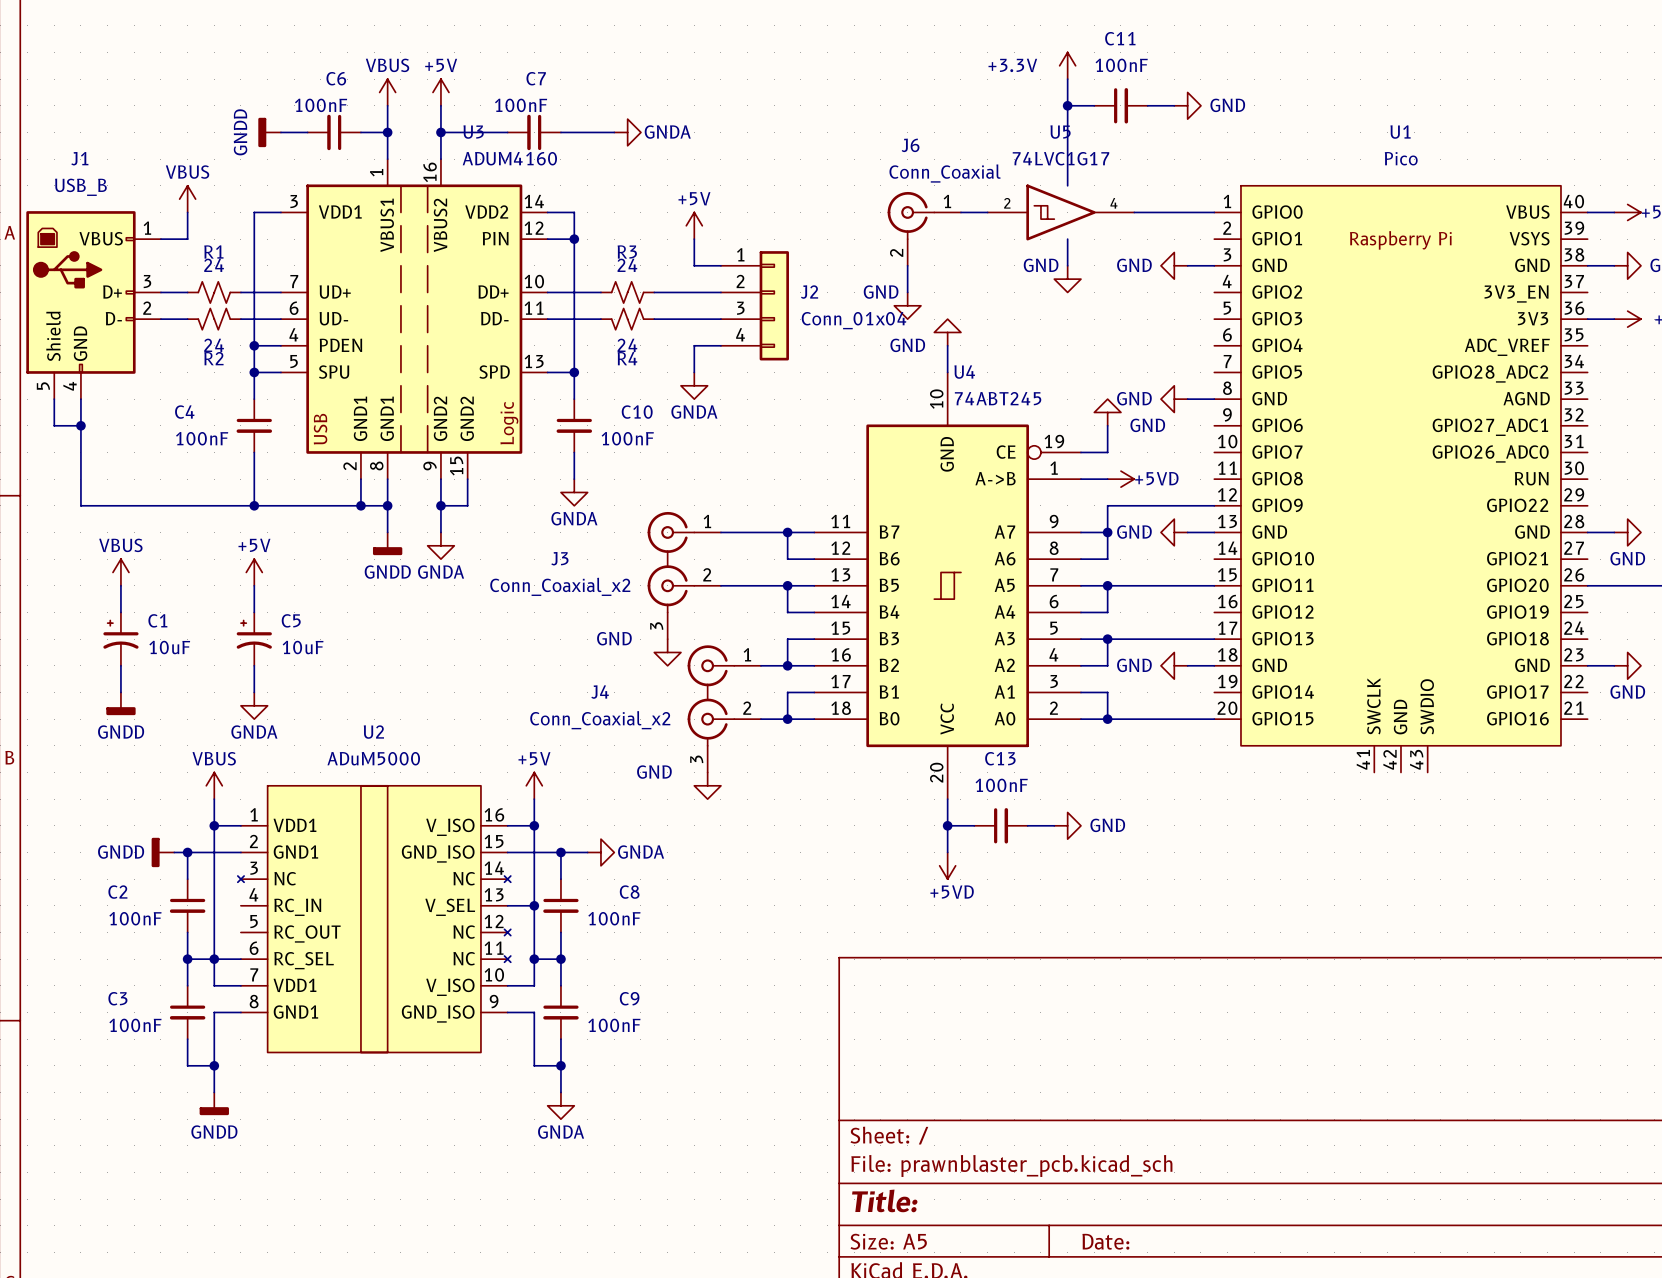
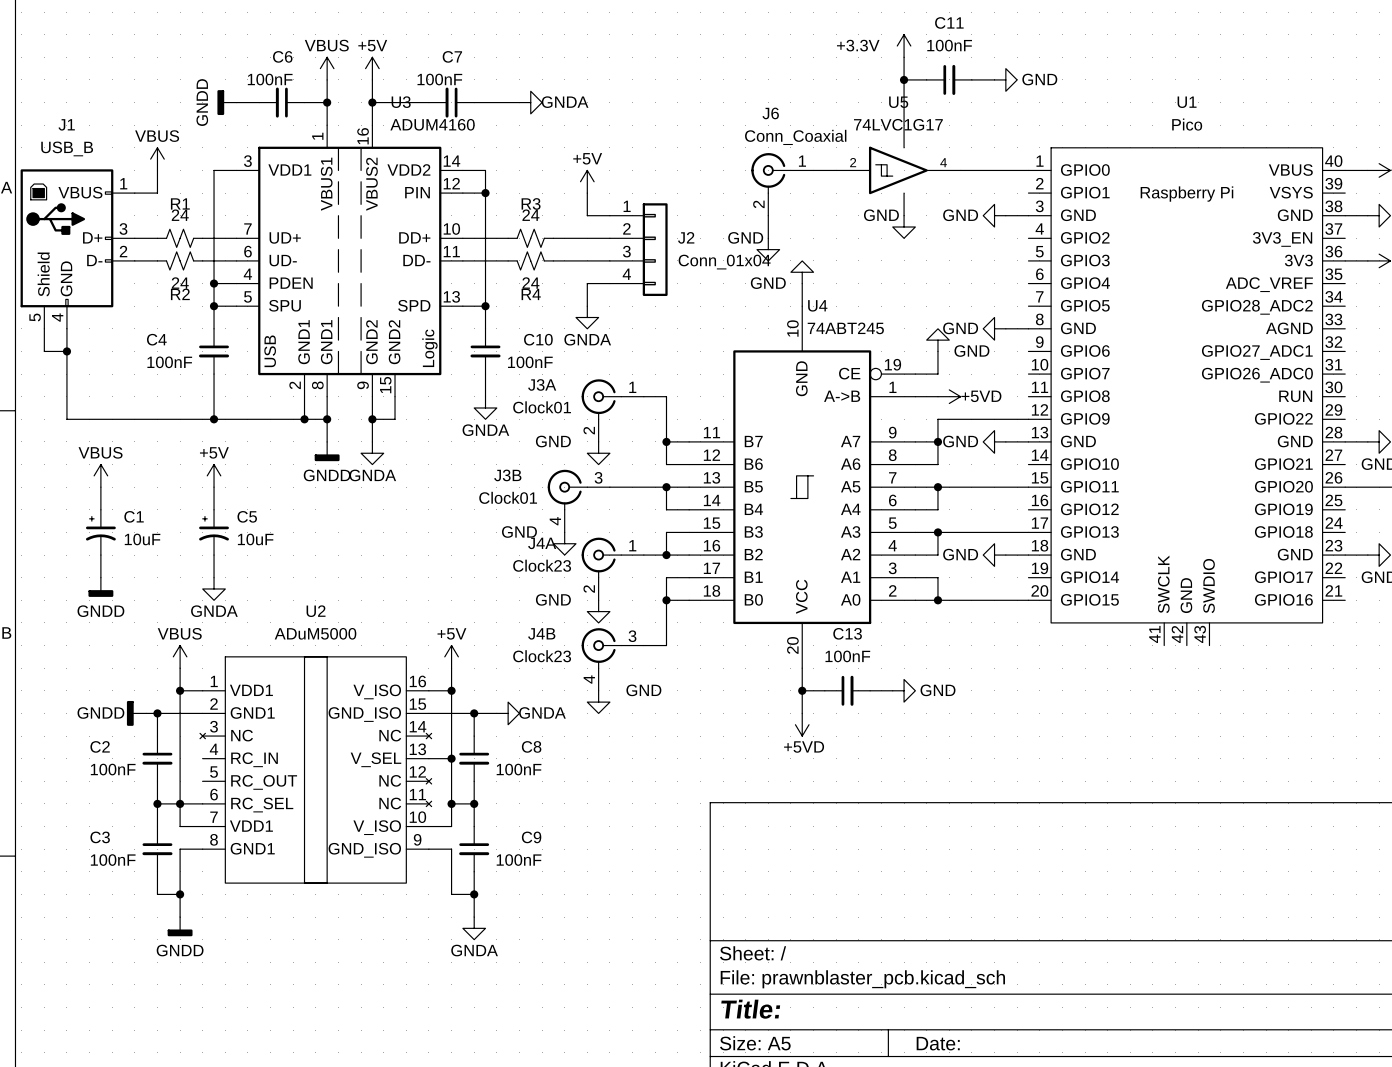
J3A: none -> Clock01 (612, 410)
wire: (720, 532) (787, 532) -> (643, 396) (666, 396) (666, 441)
power symbol: none -> GND (598, 453)
J3: Conn_Coaxial_x2 (684, 575) -> none
J3B: none -> Clock01 (578, 501)
J4A: none -> Clock23 (612, 568)
J4: Conn_Coaxial_x2 (724, 708) -> none
wire: (760, 719) (787, 719) -> (643, 645) (666, 645) (666, 600)
power symbol: none -> GND (598, 611)
power symbol: GND (707, 785) -> none
J4B: none -> Clock23 (612, 659)
power symbol: none -> GND (598, 702)

